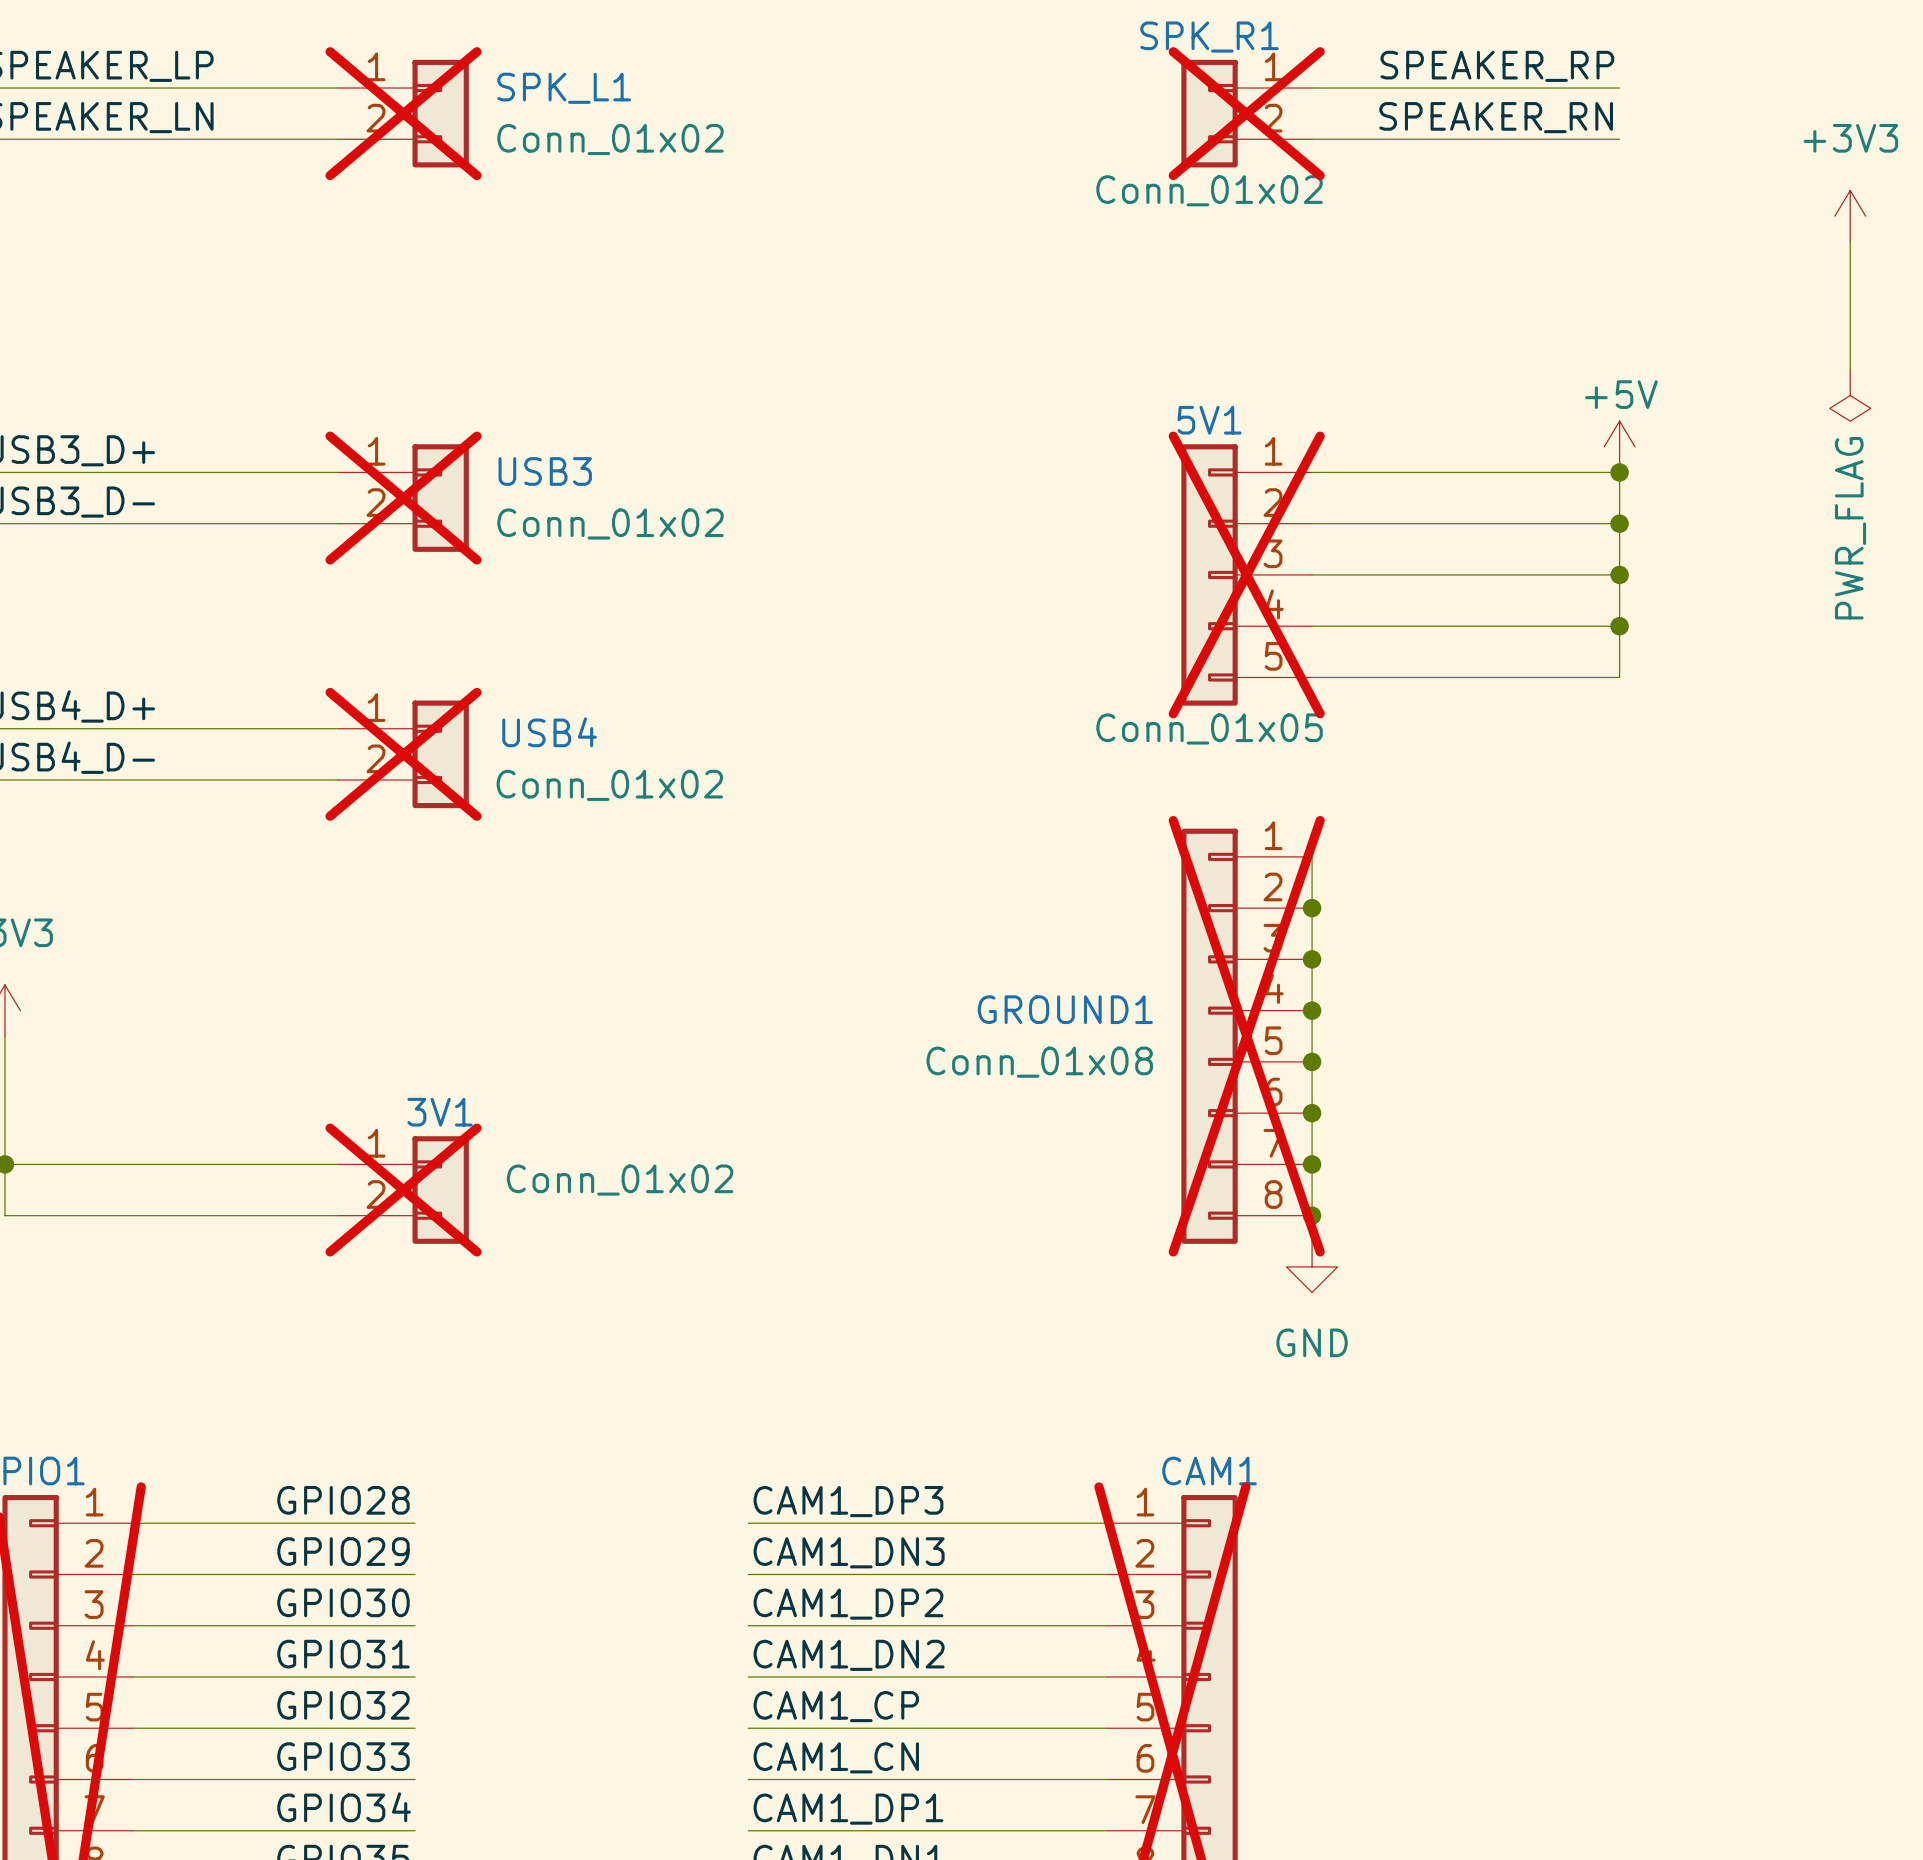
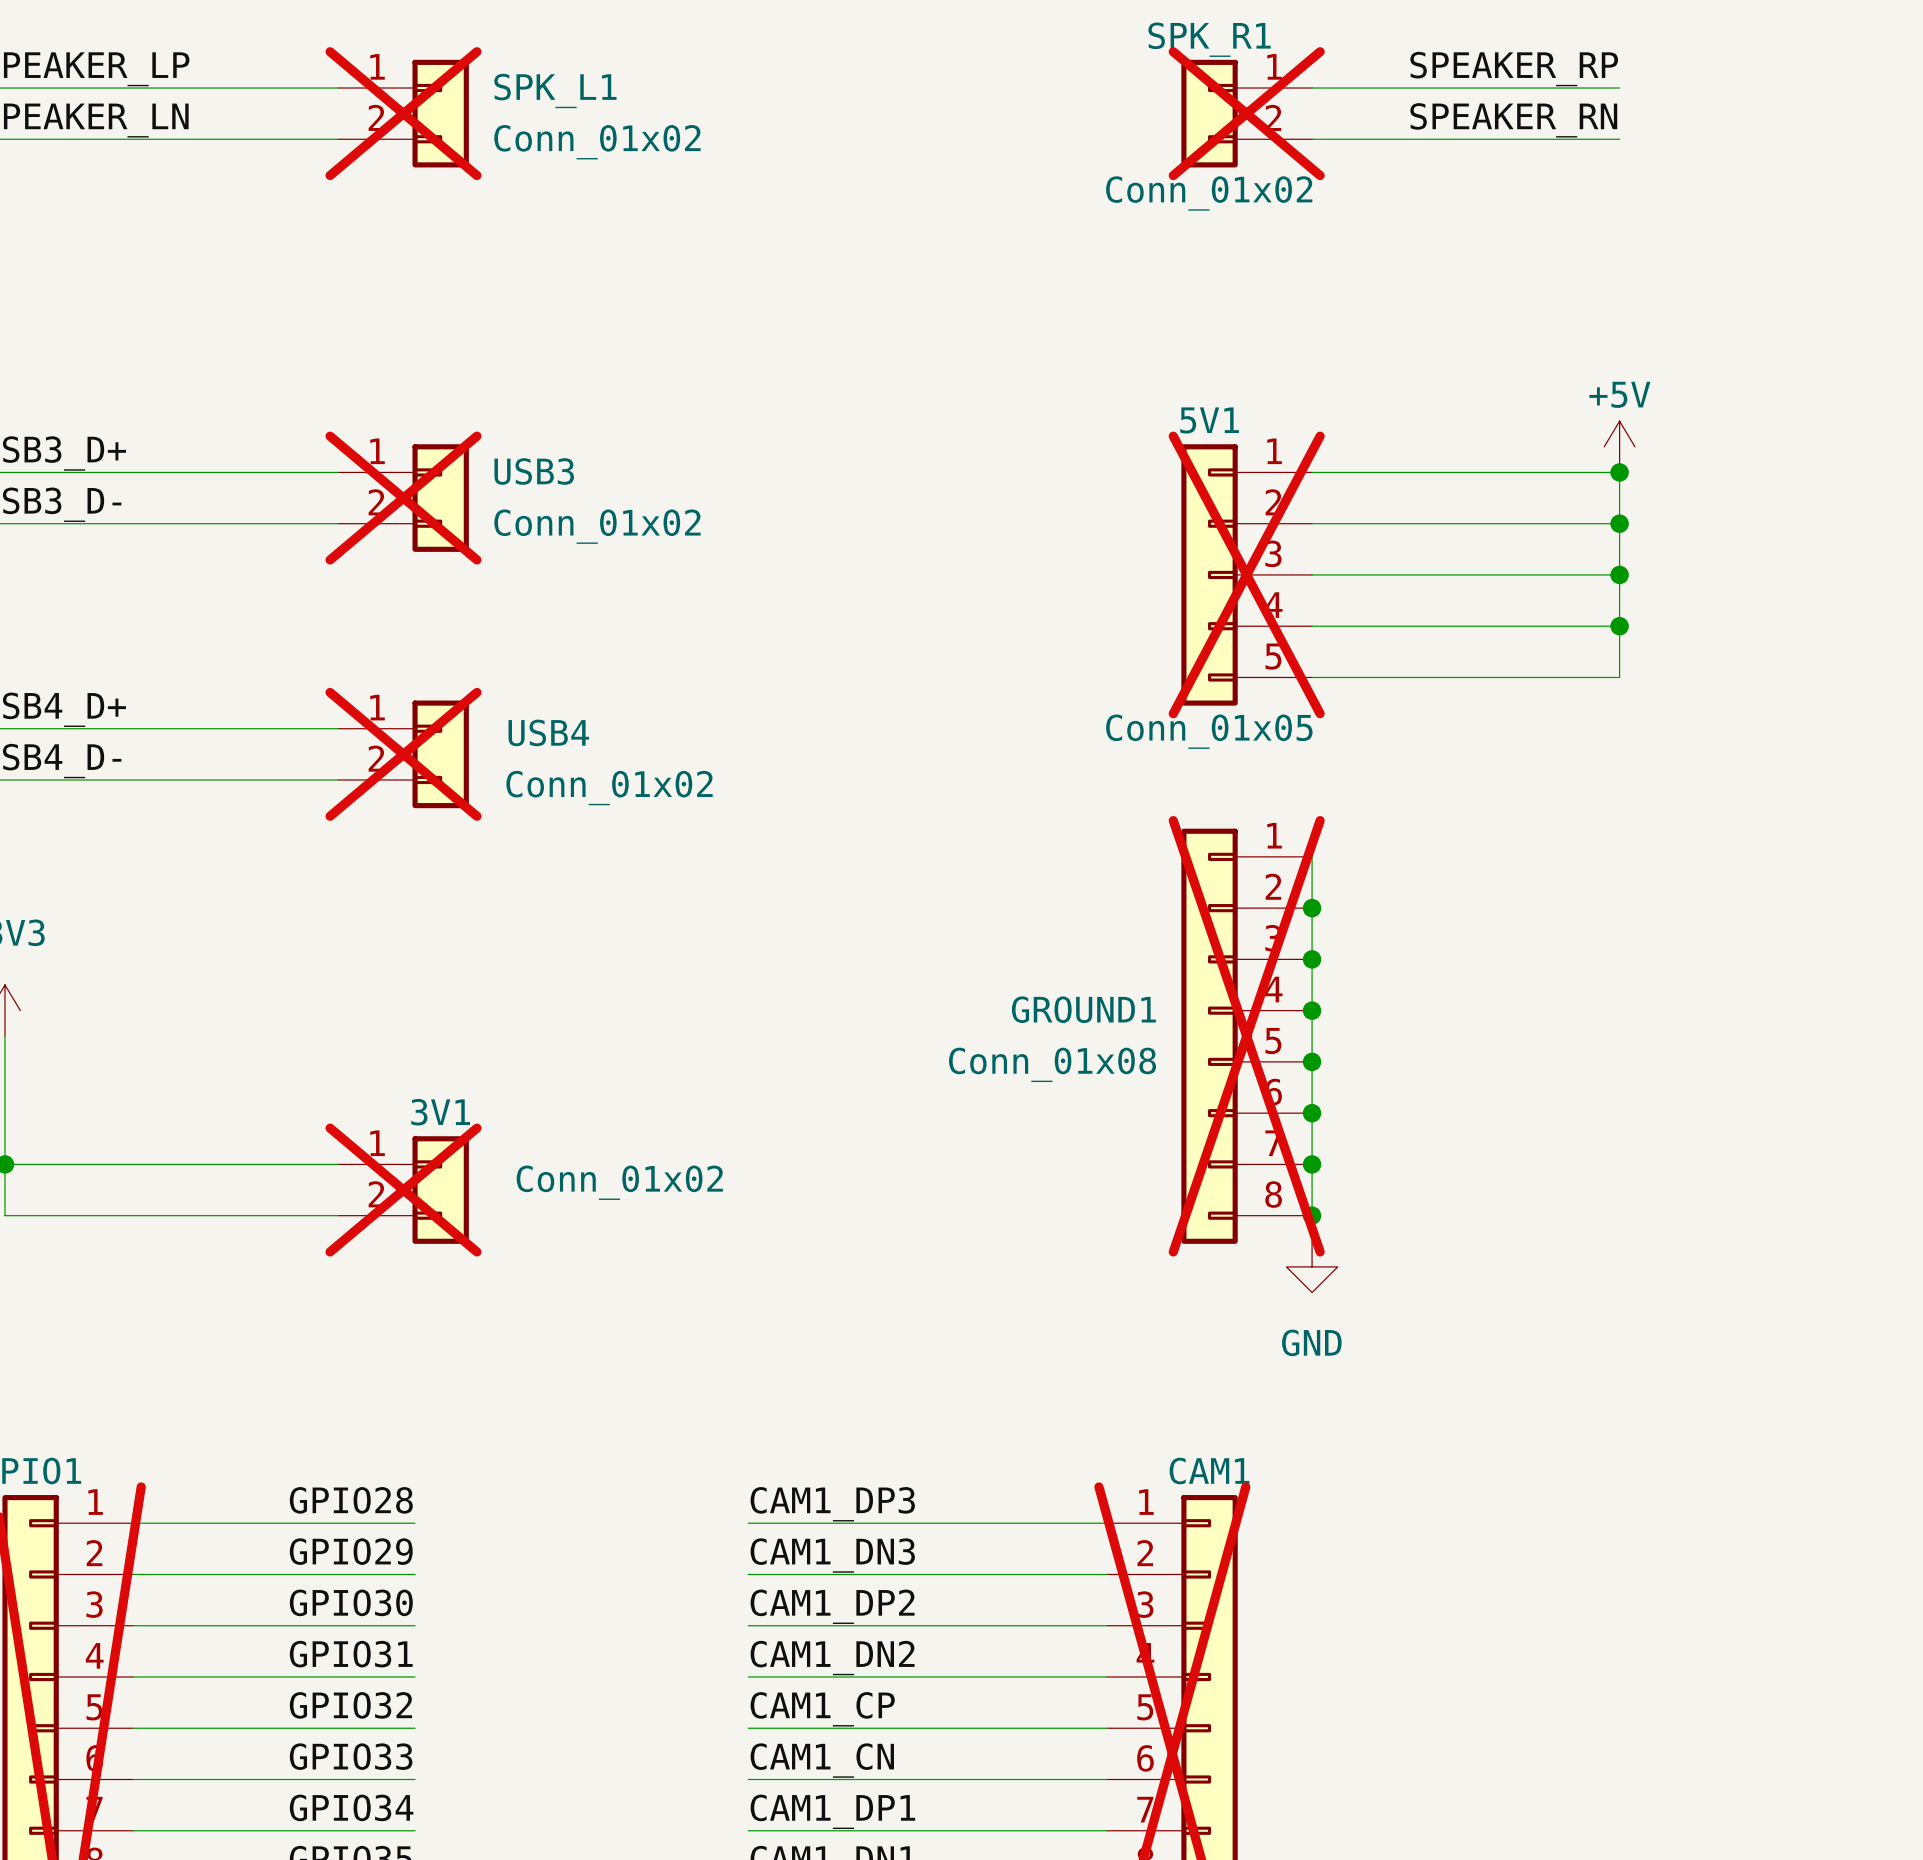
power symbol: +3V3 (1850, 216) -> none
wire: (1850, 241) (1850, 369) -> none
power symbol: PWR_FLAG (1850, 395) -> none

